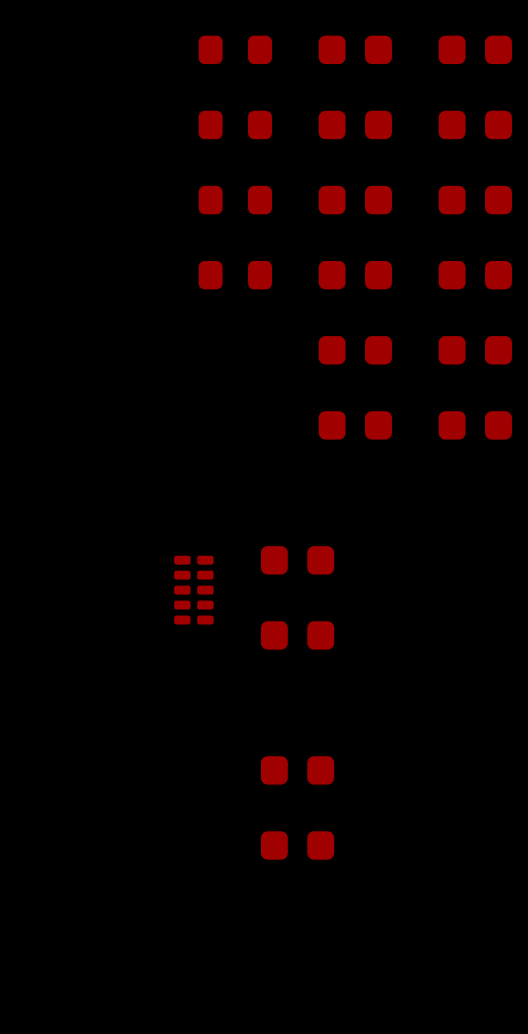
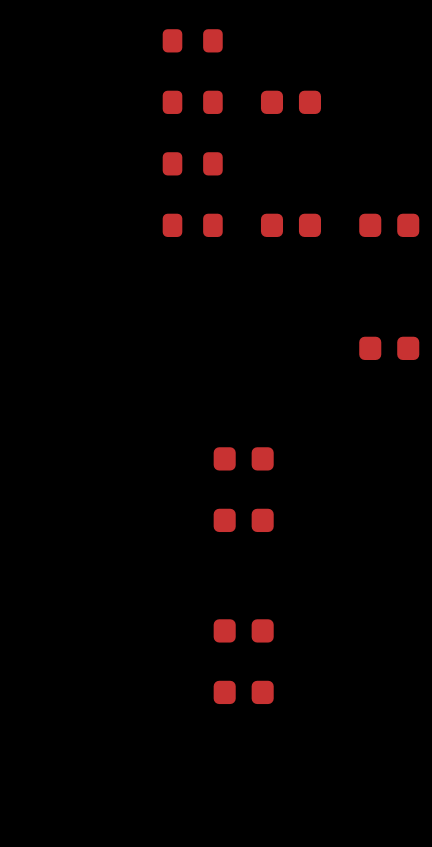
part: (355, 49) -> none
part: (475, 49) -> none
part: (475, 124) -> none
part: (355, 200) -> none
part: (475, 200) -> none
part: (355, 350) -> none
part: (475, 350) -> none
part: (355, 425) -> none
part: (193, 590) -> none

